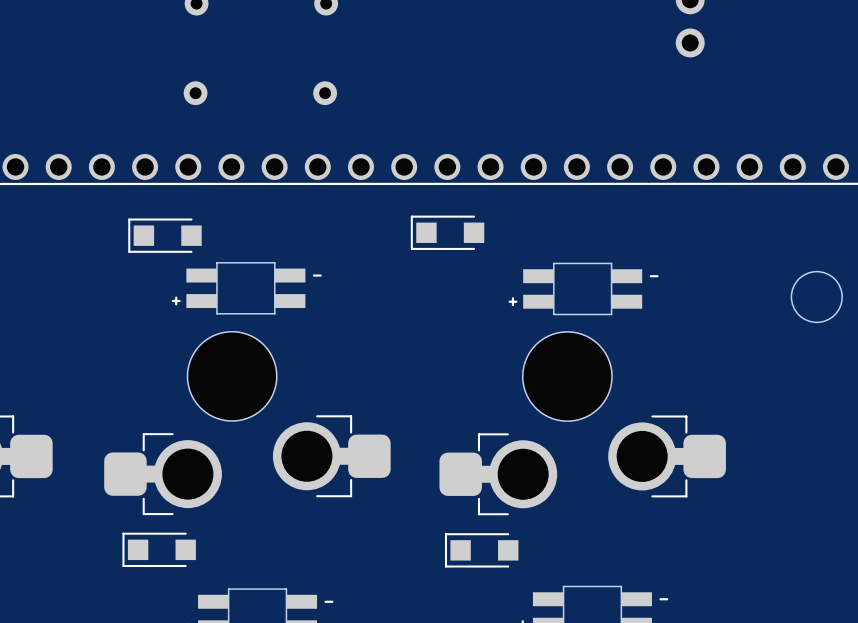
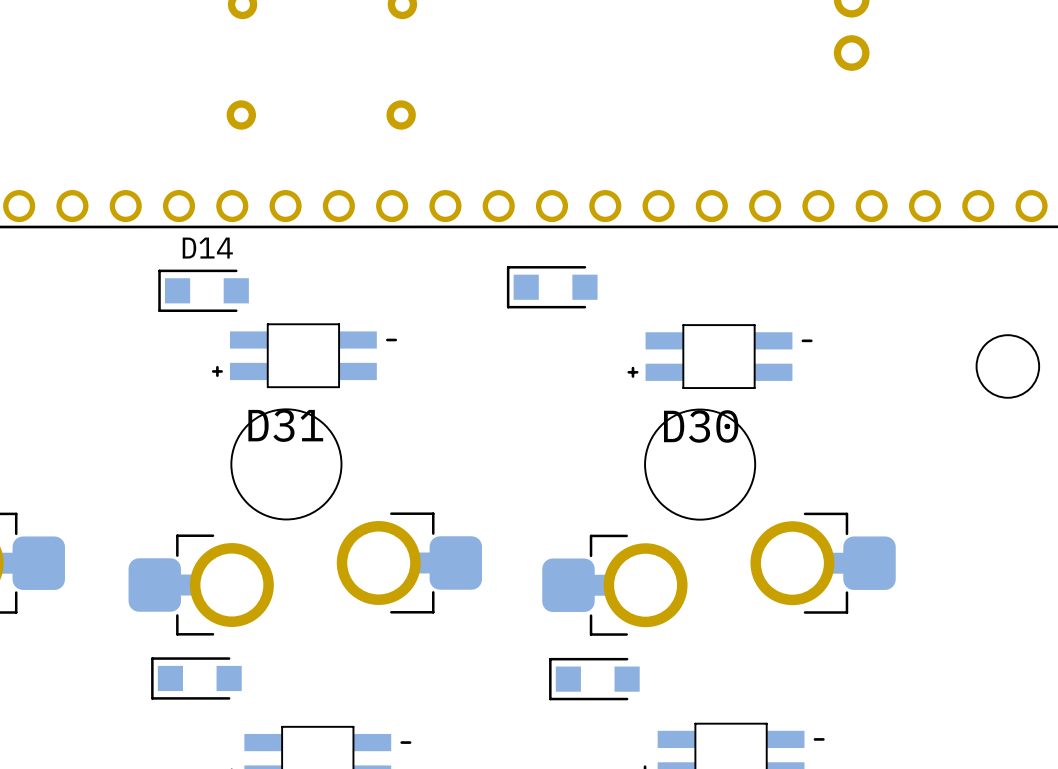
D14 name: none -> D14 (207, 248)
D31 name: none -> D31 (285, 425)
D30 name: none -> D30 (701, 426)

